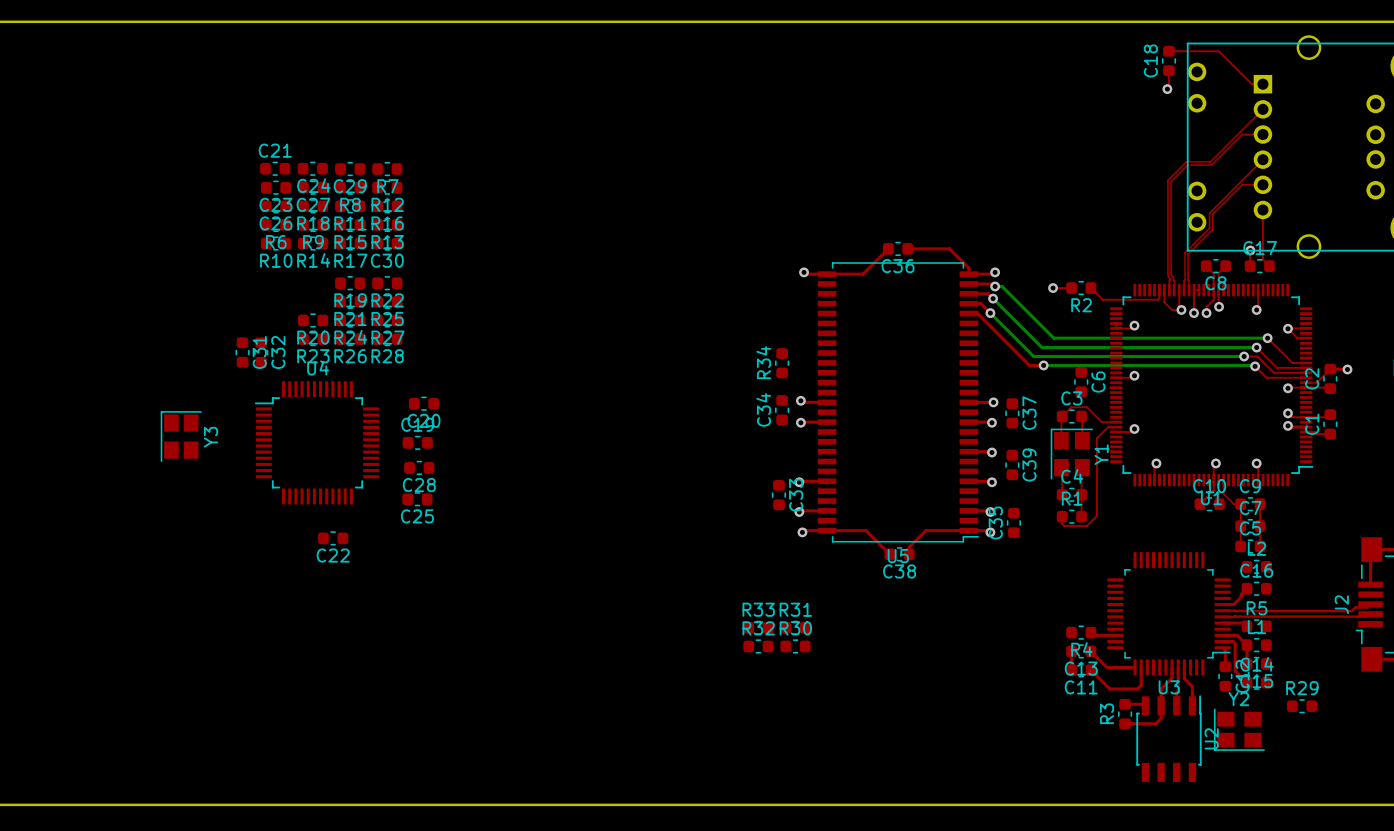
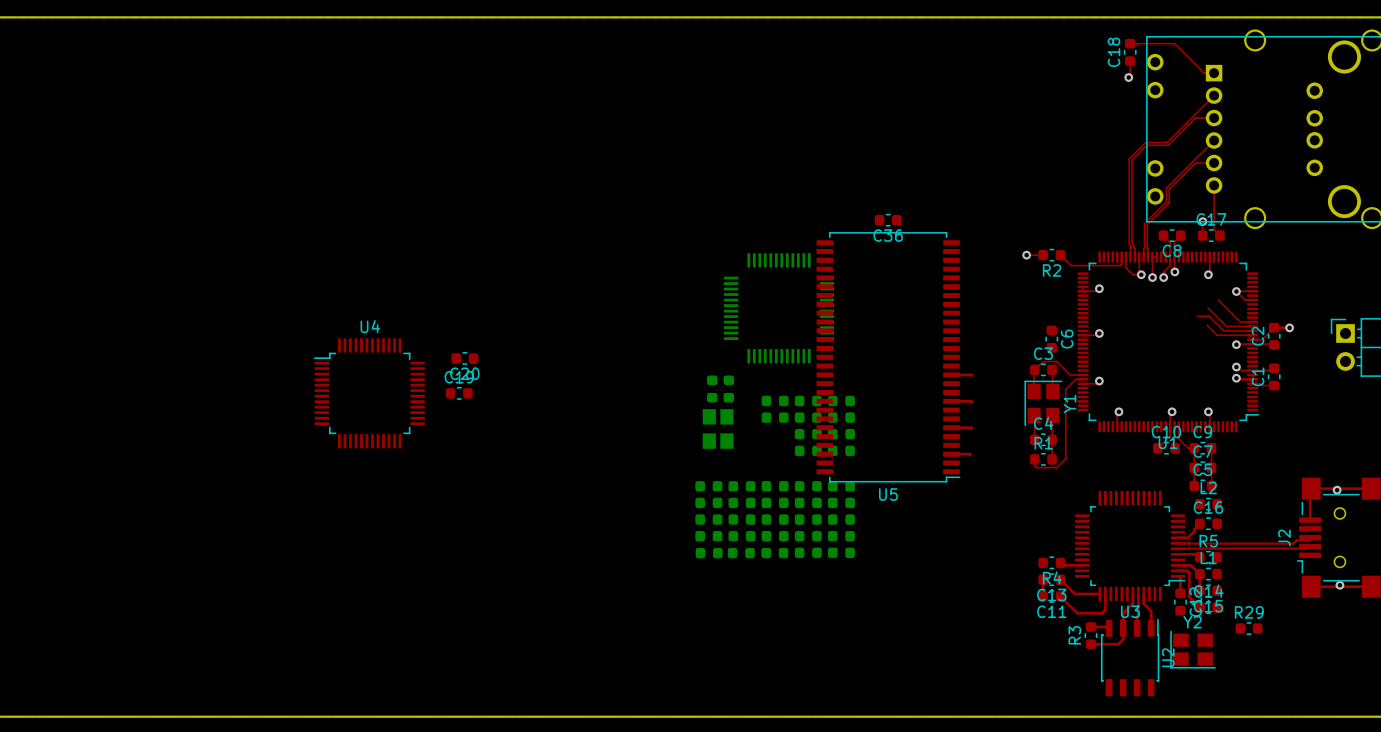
C21: (275, 168) -> none
C24: (312, 168) -> none
C29: (350, 169) -> none
R7: (387, 169) -> none
C23: (275, 187) -> none
C27: (313, 187) -> none
R8: (350, 187) -> none
R12: (387, 187) -> none
C26: (275, 206) -> none
R18: (313, 206) -> none
R11: (350, 206) -> none
R16: (387, 206) -> none
R6: (275, 224) -> none
R9: (313, 224) -> none
R15: (350, 224) -> none
R13: (387, 224) -> none
R10: (275, 243) -> none
R14: (313, 243) -> none
R17: (350, 243) -> none
C30: (387, 243) -> none
top track: (888, 248) (863, 274) (805, 274) (804, 272) -> none
top track: (907, 248) (949, 248) (968, 268) (968, 274) (993, 274) (995, 272) -> none
via: (804, 272) -> none
via: (995, 272) -> none
R19: (350, 283) -> none
R22: (387, 283) -> none
top track: (968, 283) (992, 283) (995, 286) -> none
bottom track: (995, 286) (1002, 286) (1053, 338) (1267, 338) -> none
via: (995, 286) -> none
top track: (968, 293) (988, 293) (993, 298) -> none
bottom track: (993, 298) (1042, 347) (1256, 347) -> none
via: (993, 298) -> none
R21: (350, 301) -> none
R25: (387, 301) -> none
top track: (968, 303) (981, 303) (990, 313) -> none
top track: (968, 313) (977, 313) (1029, 365) (1043, 365) -> none
bottom track: (990, 313) (1033, 356) (1244, 356) -> none
via: (990, 313) -> none
R20: (313, 320) -> none
R24: (350, 320) -> none
R27: (387, 320) -> none
via: (1267, 338) -> none
R23: (313, 339) -> none
R26: (350, 339) -> none
R28: (387, 339) -> none
part: none -> (779, 308)
via: (1256, 347) -> none
C31: (242, 352) -> none
C32: (261, 352) -> none
via: (1244, 356) -> none
R34: (782, 363) -> none
bottom track: (1043, 365) (1255, 366) -> none
via: (1043, 365) -> none
via: (1255, 366) -> none
top track: (800, 400) (827, 402) -> none
via: (800, 400) -> none
top track: (968, 402) (993, 402) -> none
via: (993, 402) -> none
C34: (782, 410) -> none
C37: (1012, 413) -> none
via: (800, 422) -> none
top track: (827, 422) (800, 422) -> none
via: (991, 422) -> none
Y3: (181, 436) -> none
part: none -> (712, 388)
part: none -> (728, 388)
part: none -> (775, 400)
part: none -> (808, 400)
part: none -> (841, 400)
via: (991, 452) -> none
C39: (1012, 465) -> none
C28 side: top (419, 467) -> bottom (708, 486)
part: none -> (775, 417)
part: none -> (808, 417)
part: none -> (841, 417)
top track: (827, 481) (799, 482) -> none
part: none -> (718, 428)
via: (799, 482) -> none
via: (991, 482) -> none
part: none -> (808, 434)
part: none -> (841, 434)
C33: (778, 495) -> none
C25 side: top (417, 499) -> bottom (708, 502)
part: none -> (808, 450)
part: none -> (841, 450)
top track: (827, 510) (799, 512) -> none
via: (799, 512) -> none
via: (990, 512) -> none
C35: (1013, 522) -> none
top track: (802, 532) (804, 530) (866, 530) (889, 554) -> none
via: (802, 532) -> none
top track: (990, 532) (988, 530) (925, 530) (909, 547) (909, 554) -> none
via: (990, 532) -> none
C22: (333, 538) -> none
part: none -> (741, 486)
part: none -> (775, 486)
part: none -> (808, 486)
part: none -> (841, 486)
C38: (899, 554) -> none
part: none -> (741, 502)
part: none -> (775, 502)
part: none -> (808, 502)
part: none -> (841, 502)
part: none -> (708, 519)
part: none -> (741, 519)
part: none -> (775, 519)
part: none -> (808, 519)
part: none -> (841, 519)
part: none -> (708, 536)
part: none -> (741, 536)
part: none -> (775, 536)
part: none -> (808, 536)
part: none -> (841, 536)
part: none -> (709, 553)
part: none -> (741, 553)
part: none -> (774, 553)
part: none -> (808, 552)
part: none -> (841, 552)
R33: (758, 627) -> none
R31: (795, 627) -> none
R32: (758, 646) -> none
R30: (795, 646) -> none

